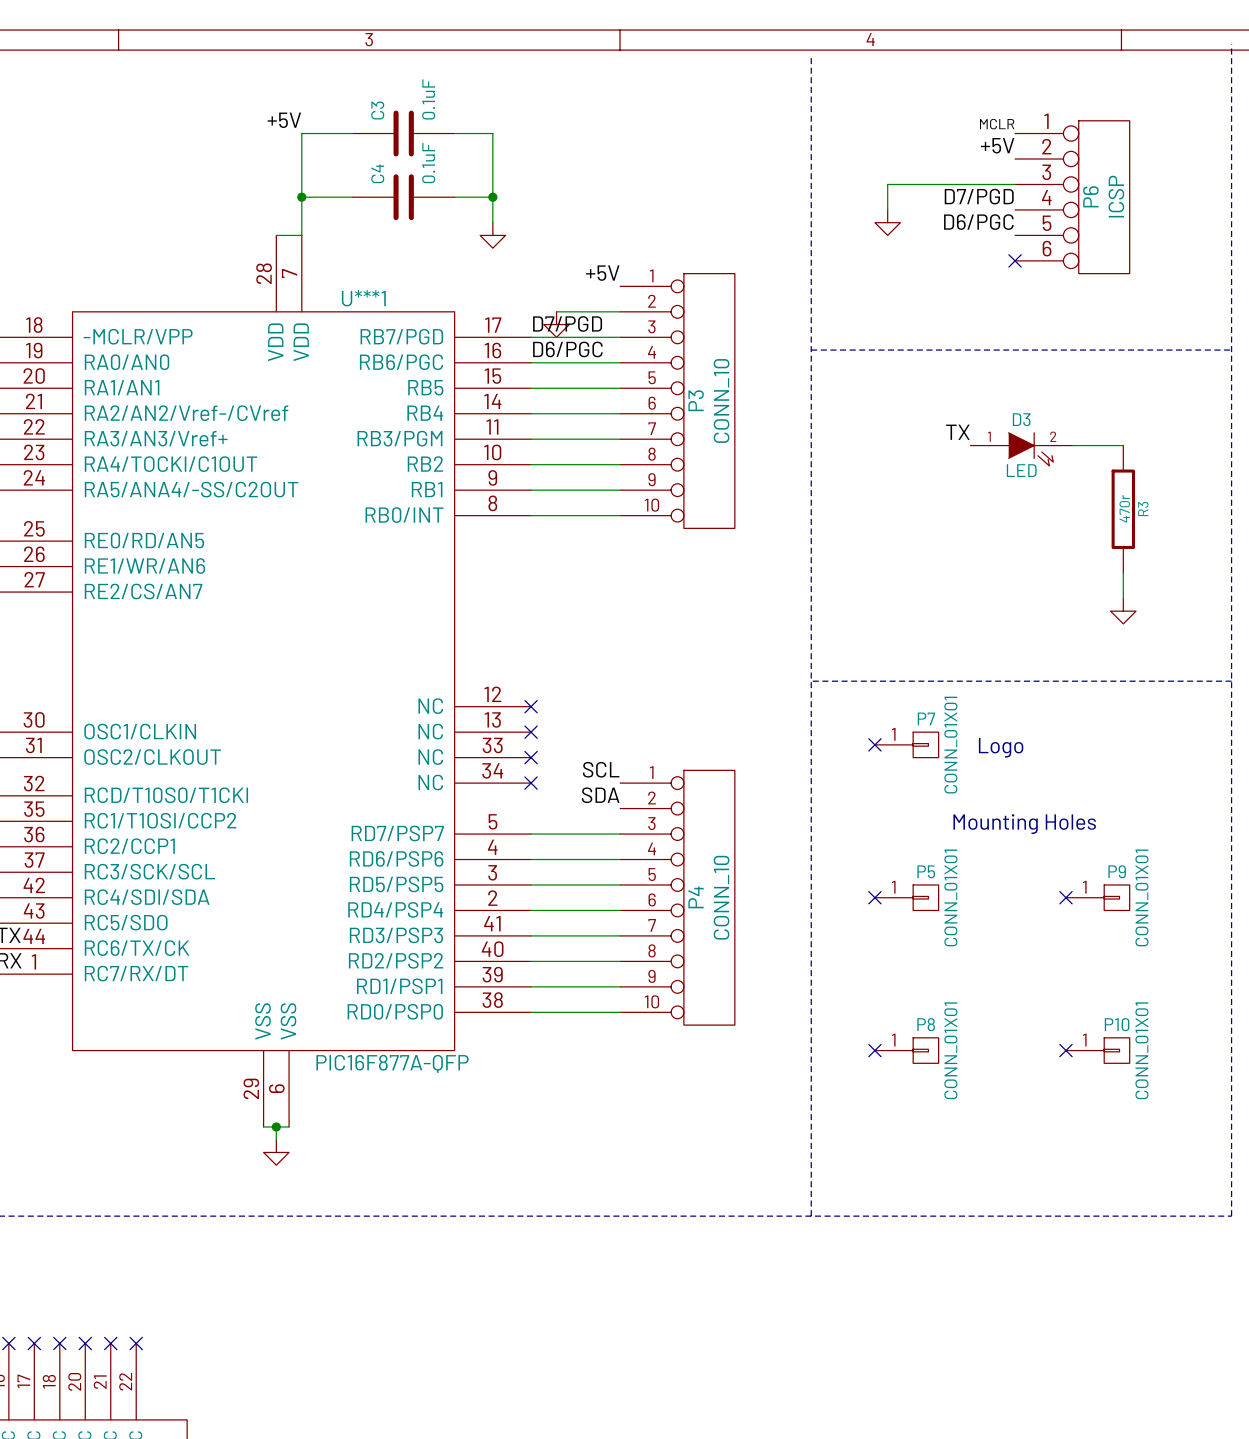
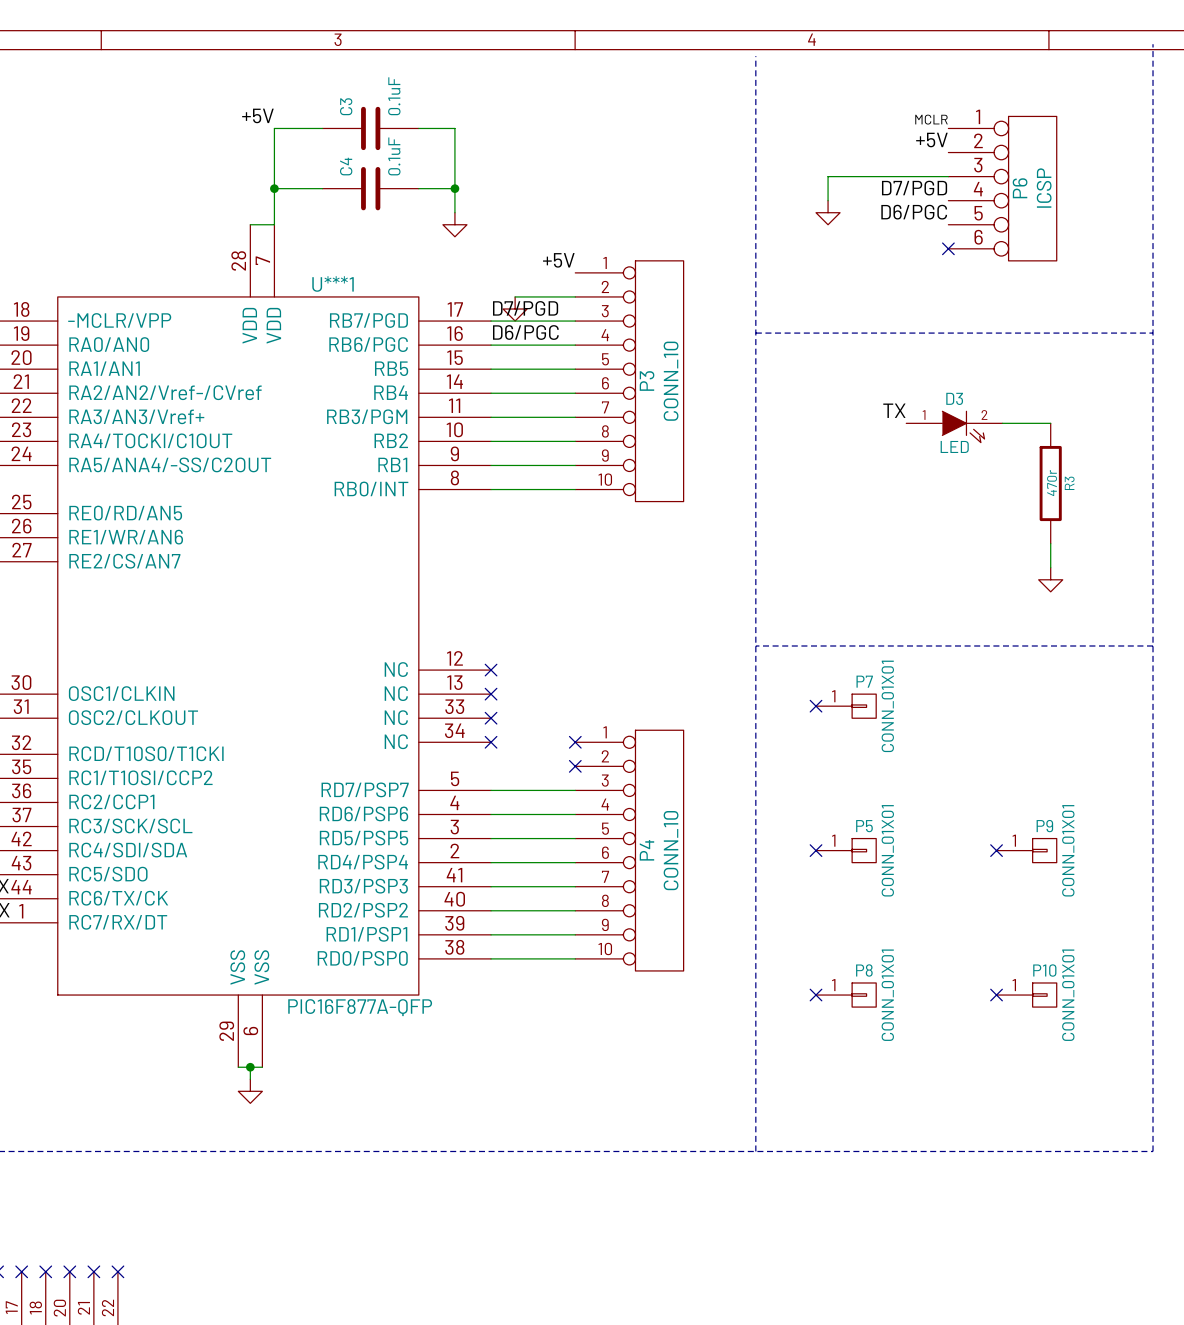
text: Logo (1001, 747) -> none
label: SCL (601, 769) -> none
no-connect mark: none -> (575, 742)
label: SDA (600, 795) -> none
no-connect mark: none -> (575, 766)
text: Mounting Holes (1024, 824) -> none

